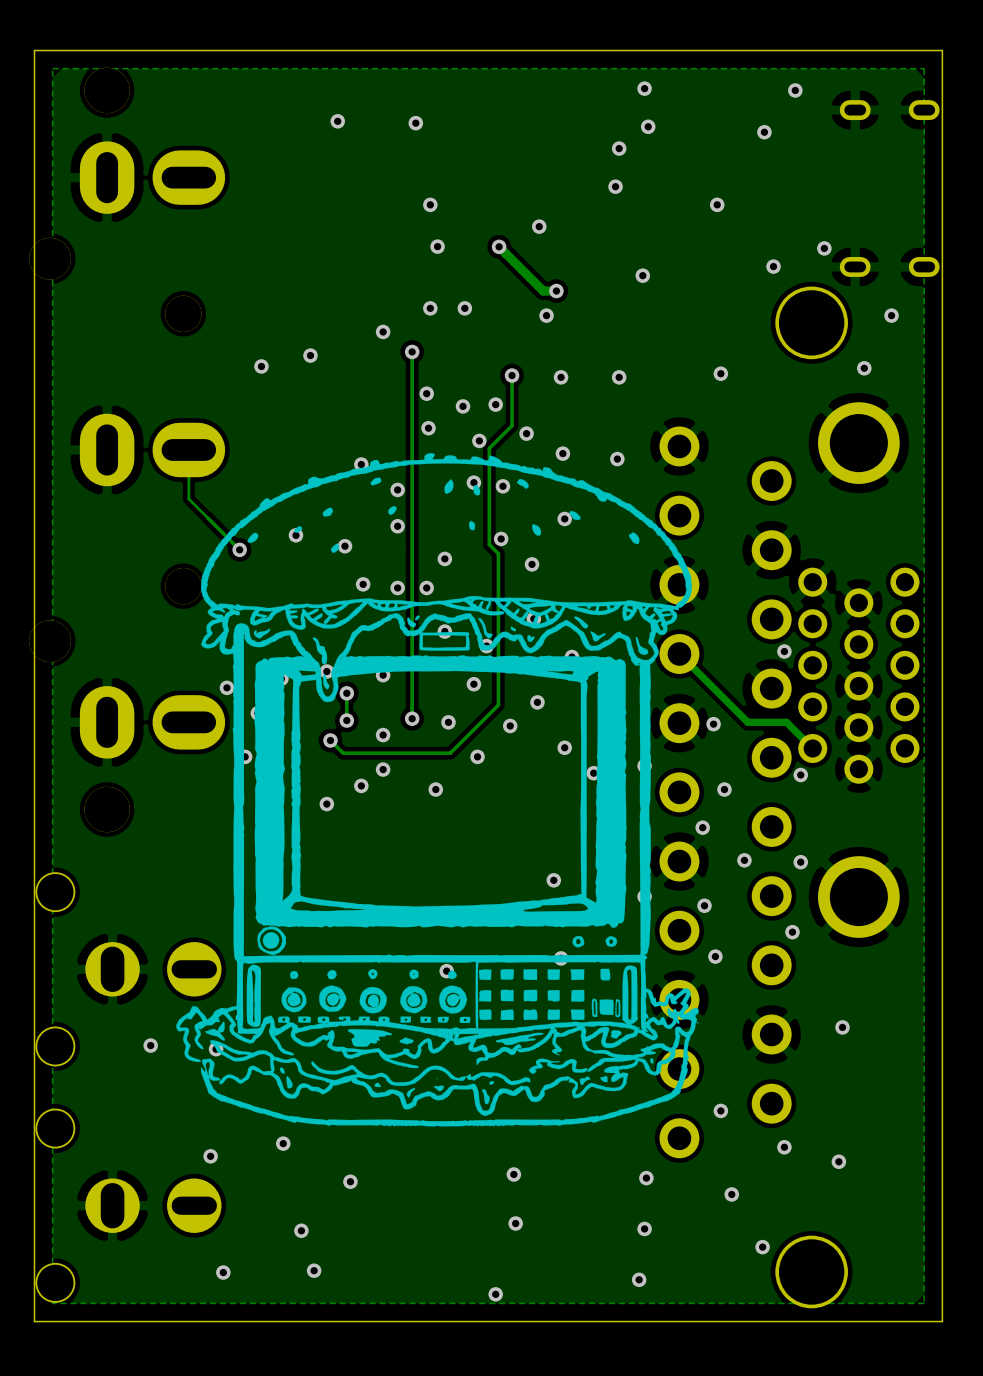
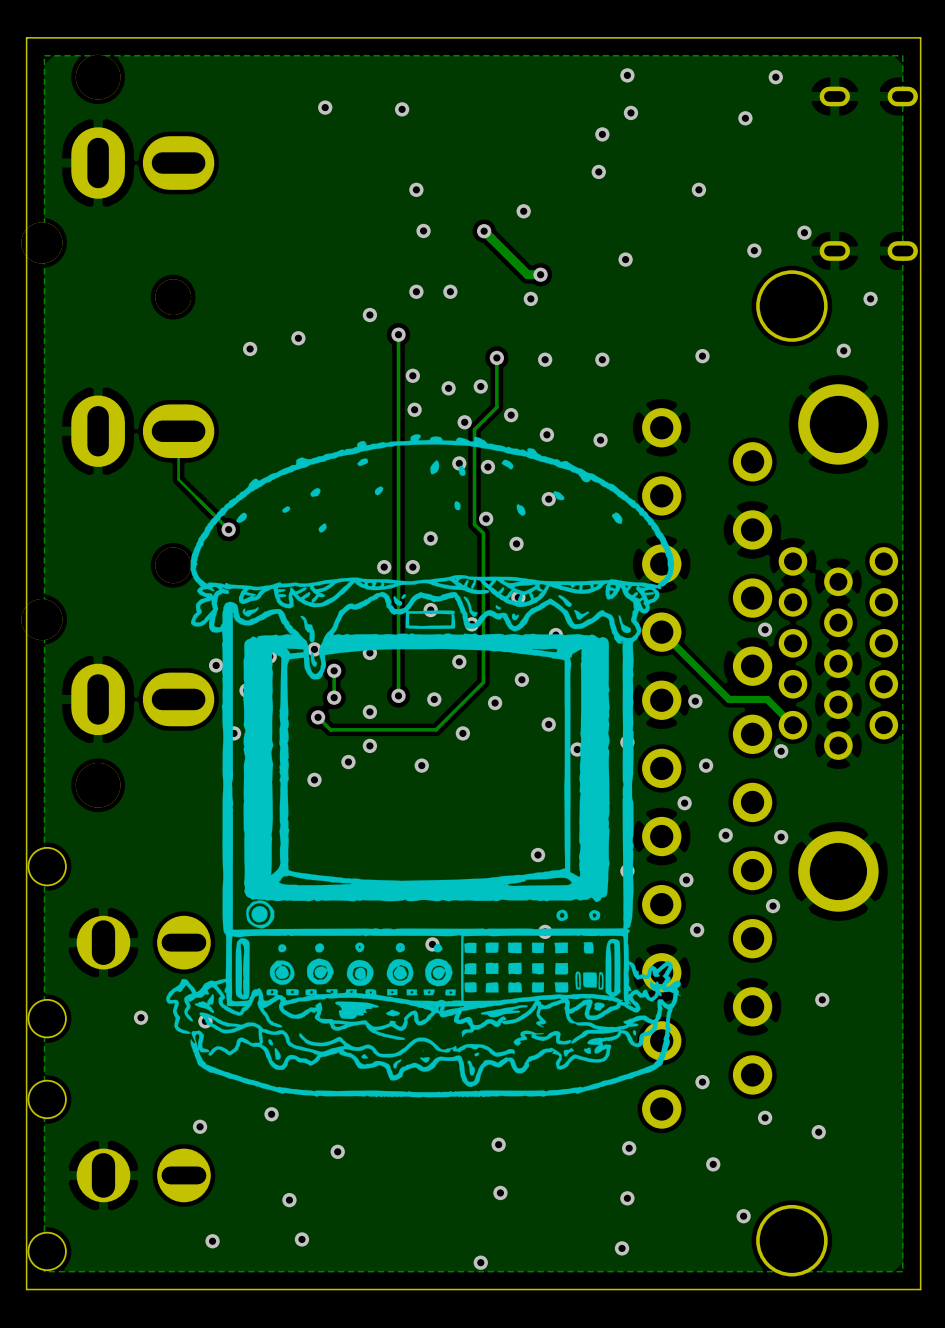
via: (361, 464) -> none
via: (397, 489) -> none
via: (397, 526) -> none
via: (295, 535) -> none
via: (344, 546) -> none
via: (363, 584) -> none

